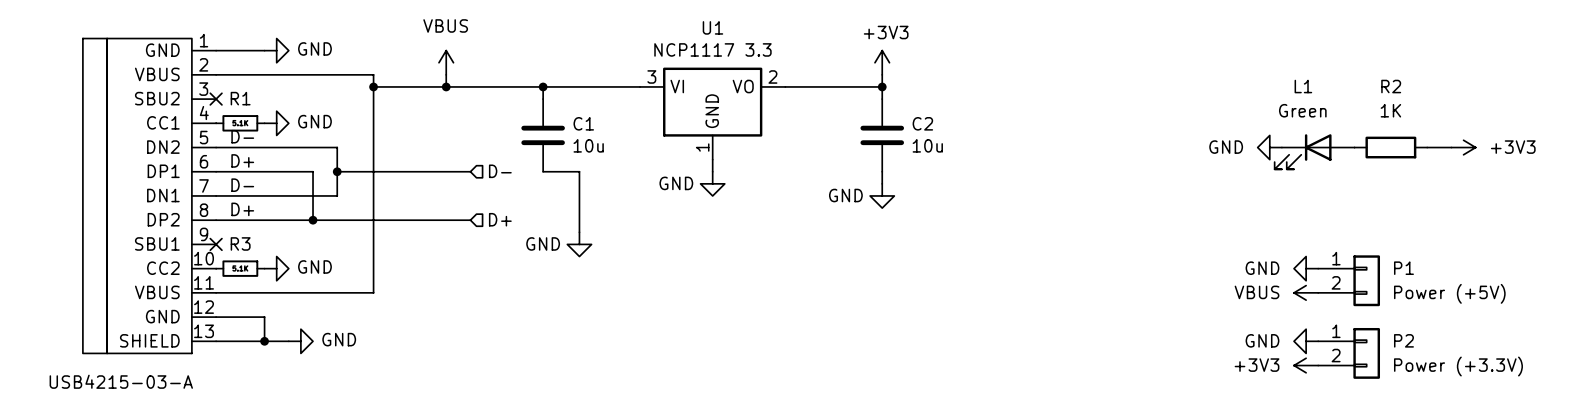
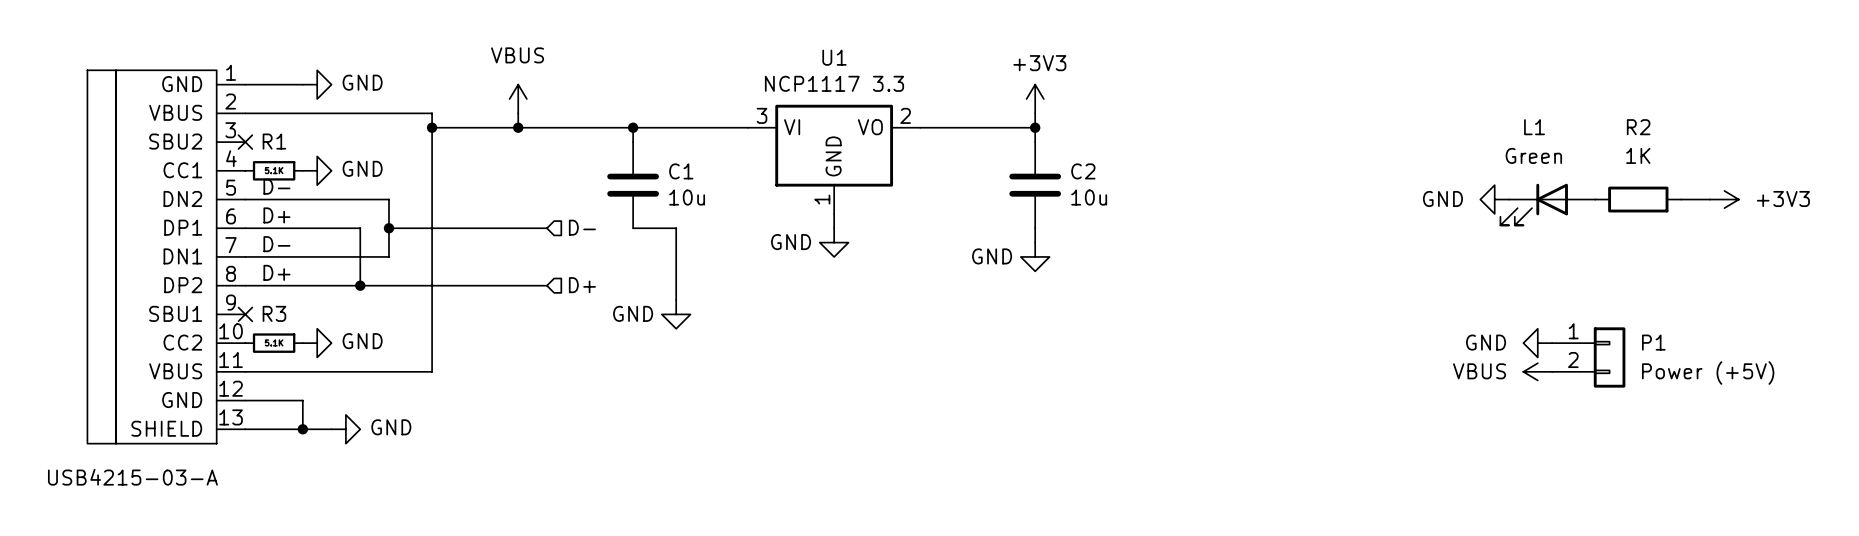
power symbol: GND (1306, 341) -> none
P2: Power (+3.3V) (1349, 353) -> none
power symbol: +3V3 (1306, 365) -> none

